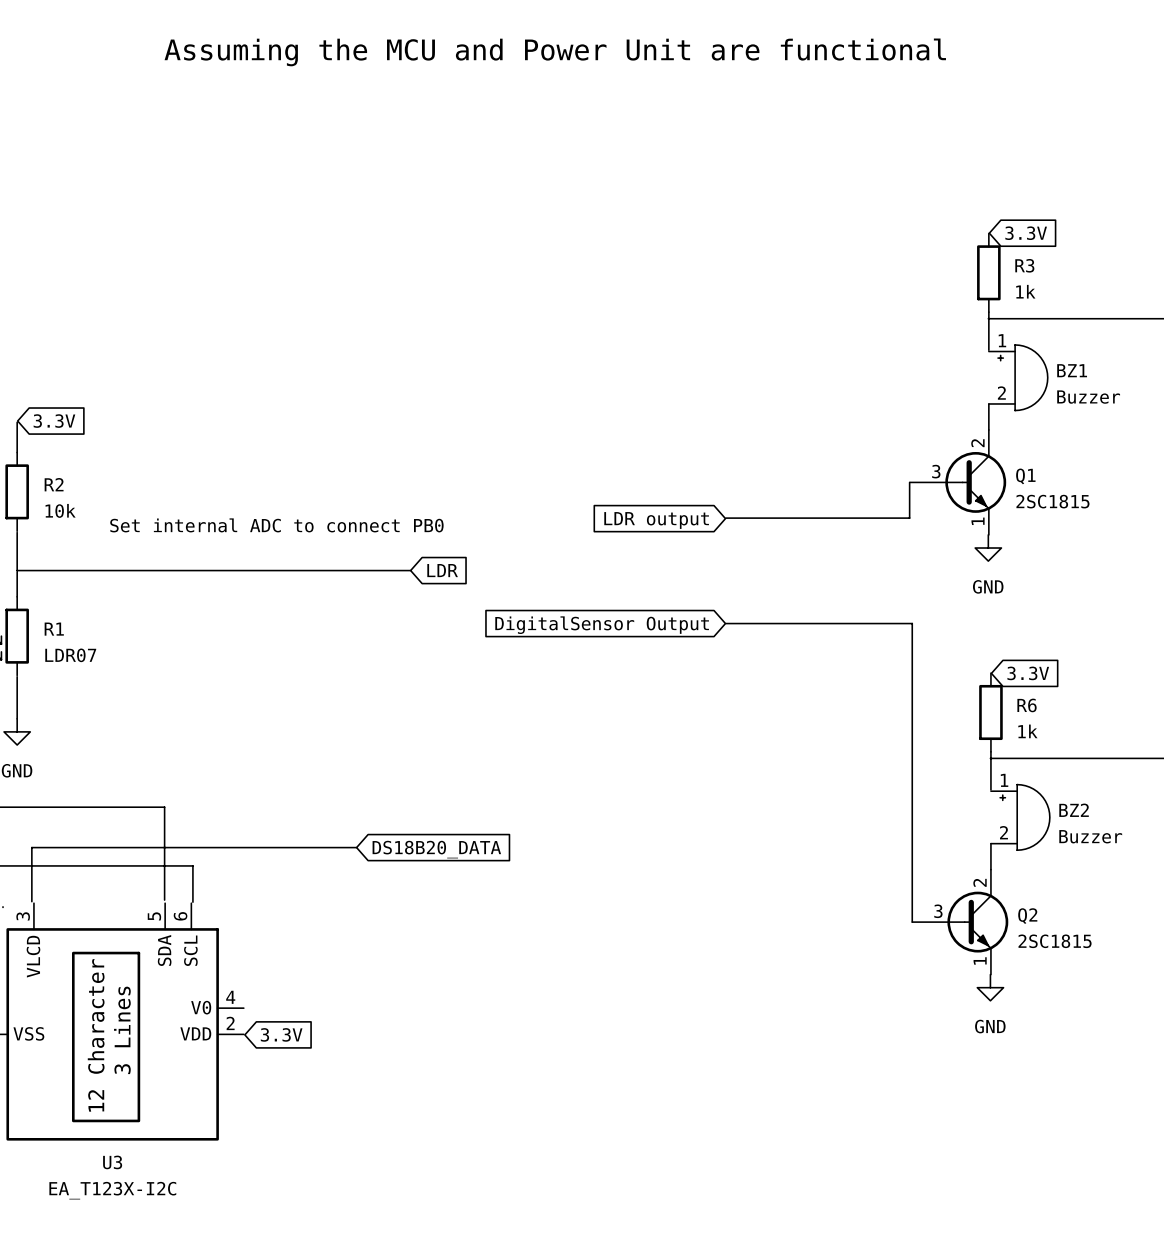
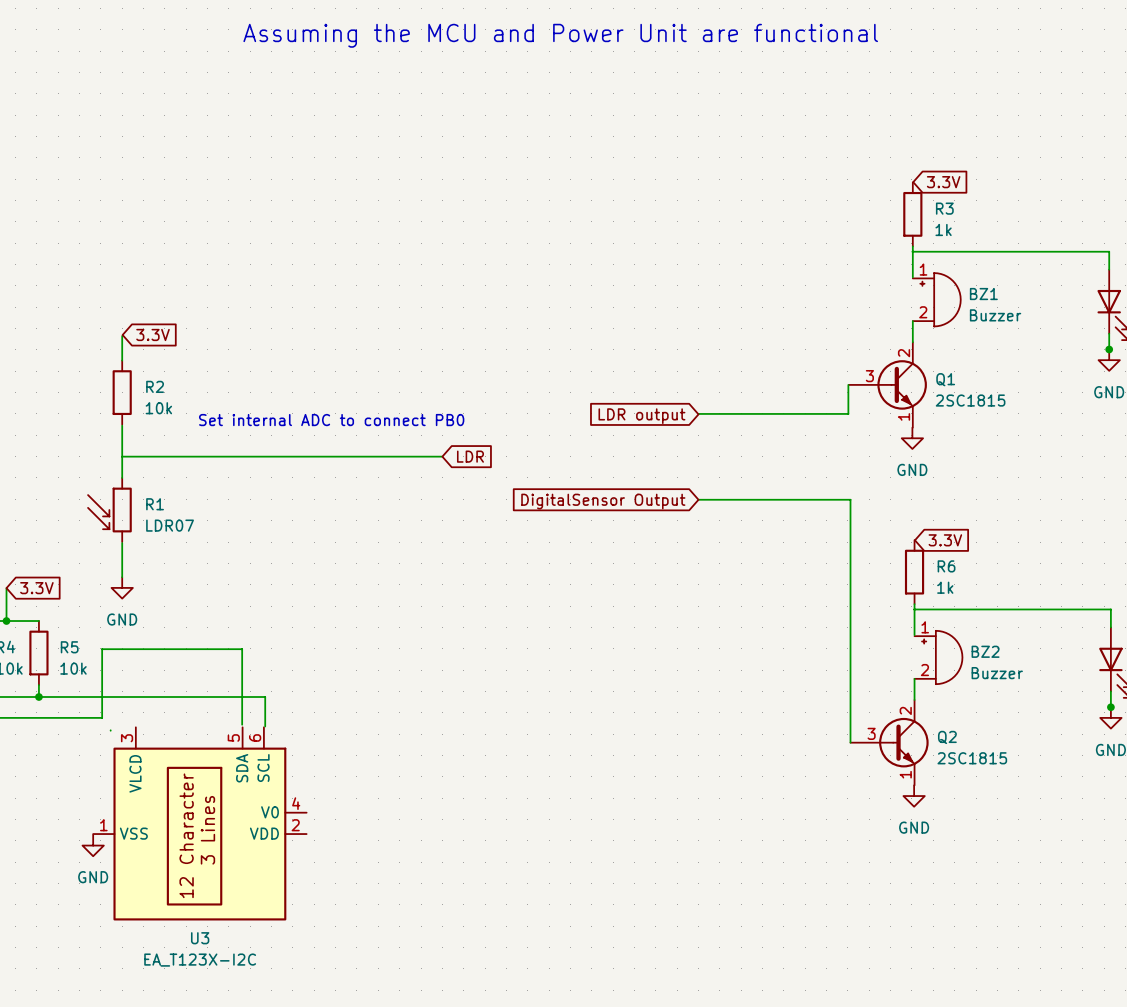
wire: (356, 847) (31, 847) (31, 901) -> none
global label: DS18B20_DATA (436, 849) -> none
global label: 3.3V (281, 1034) -> none

